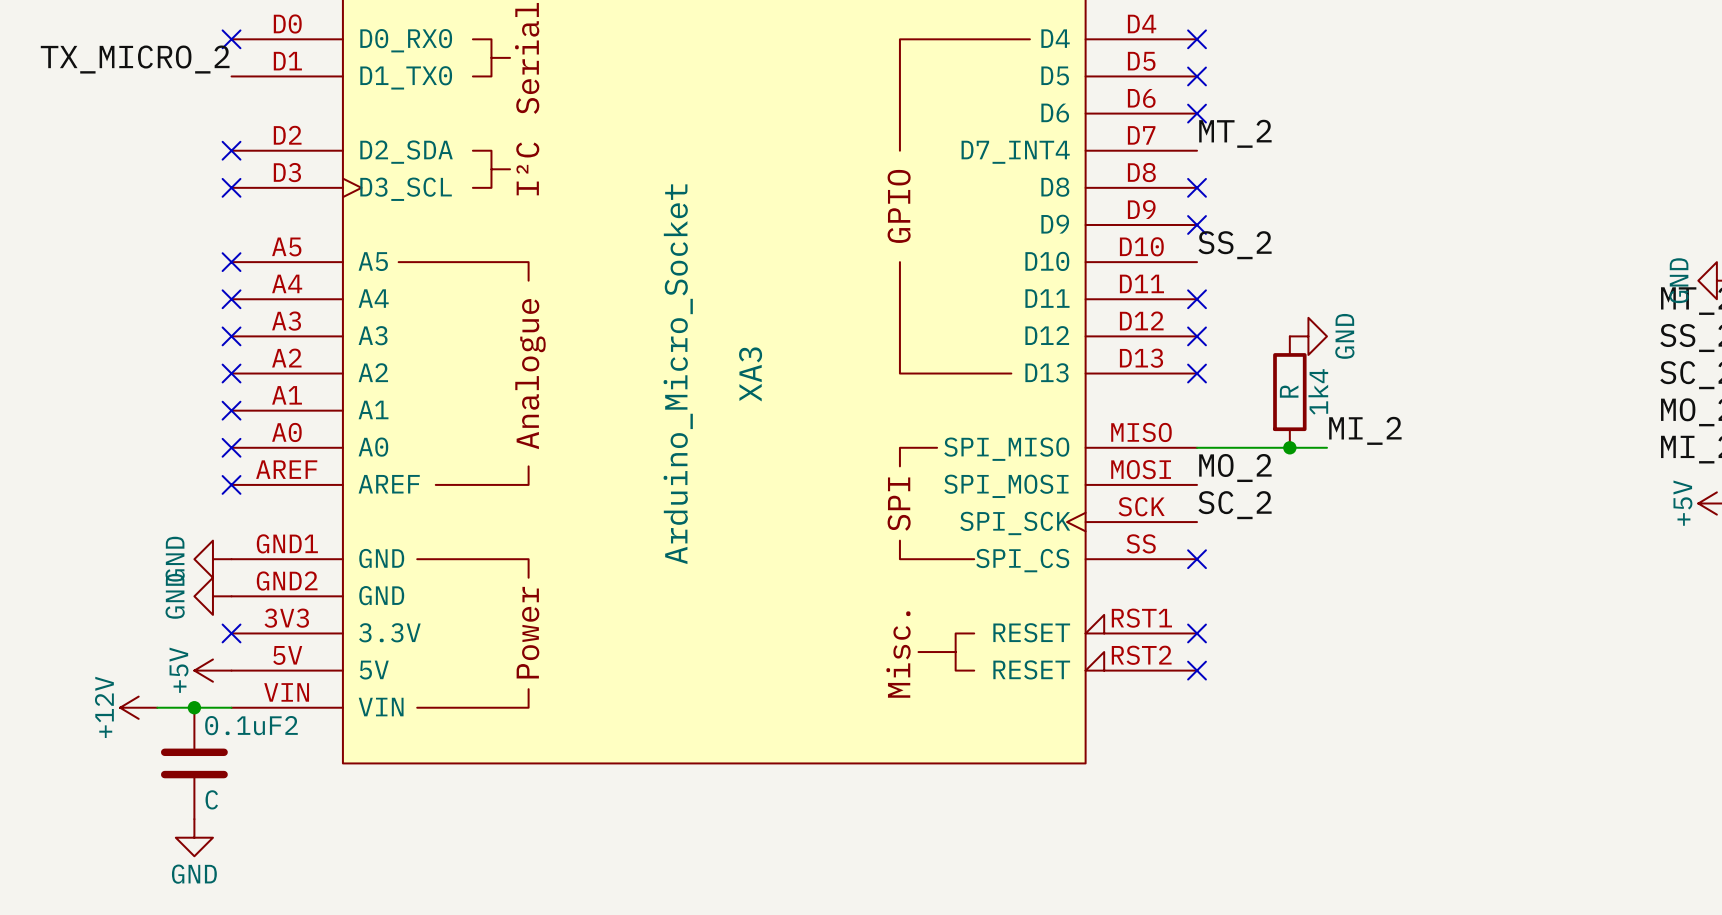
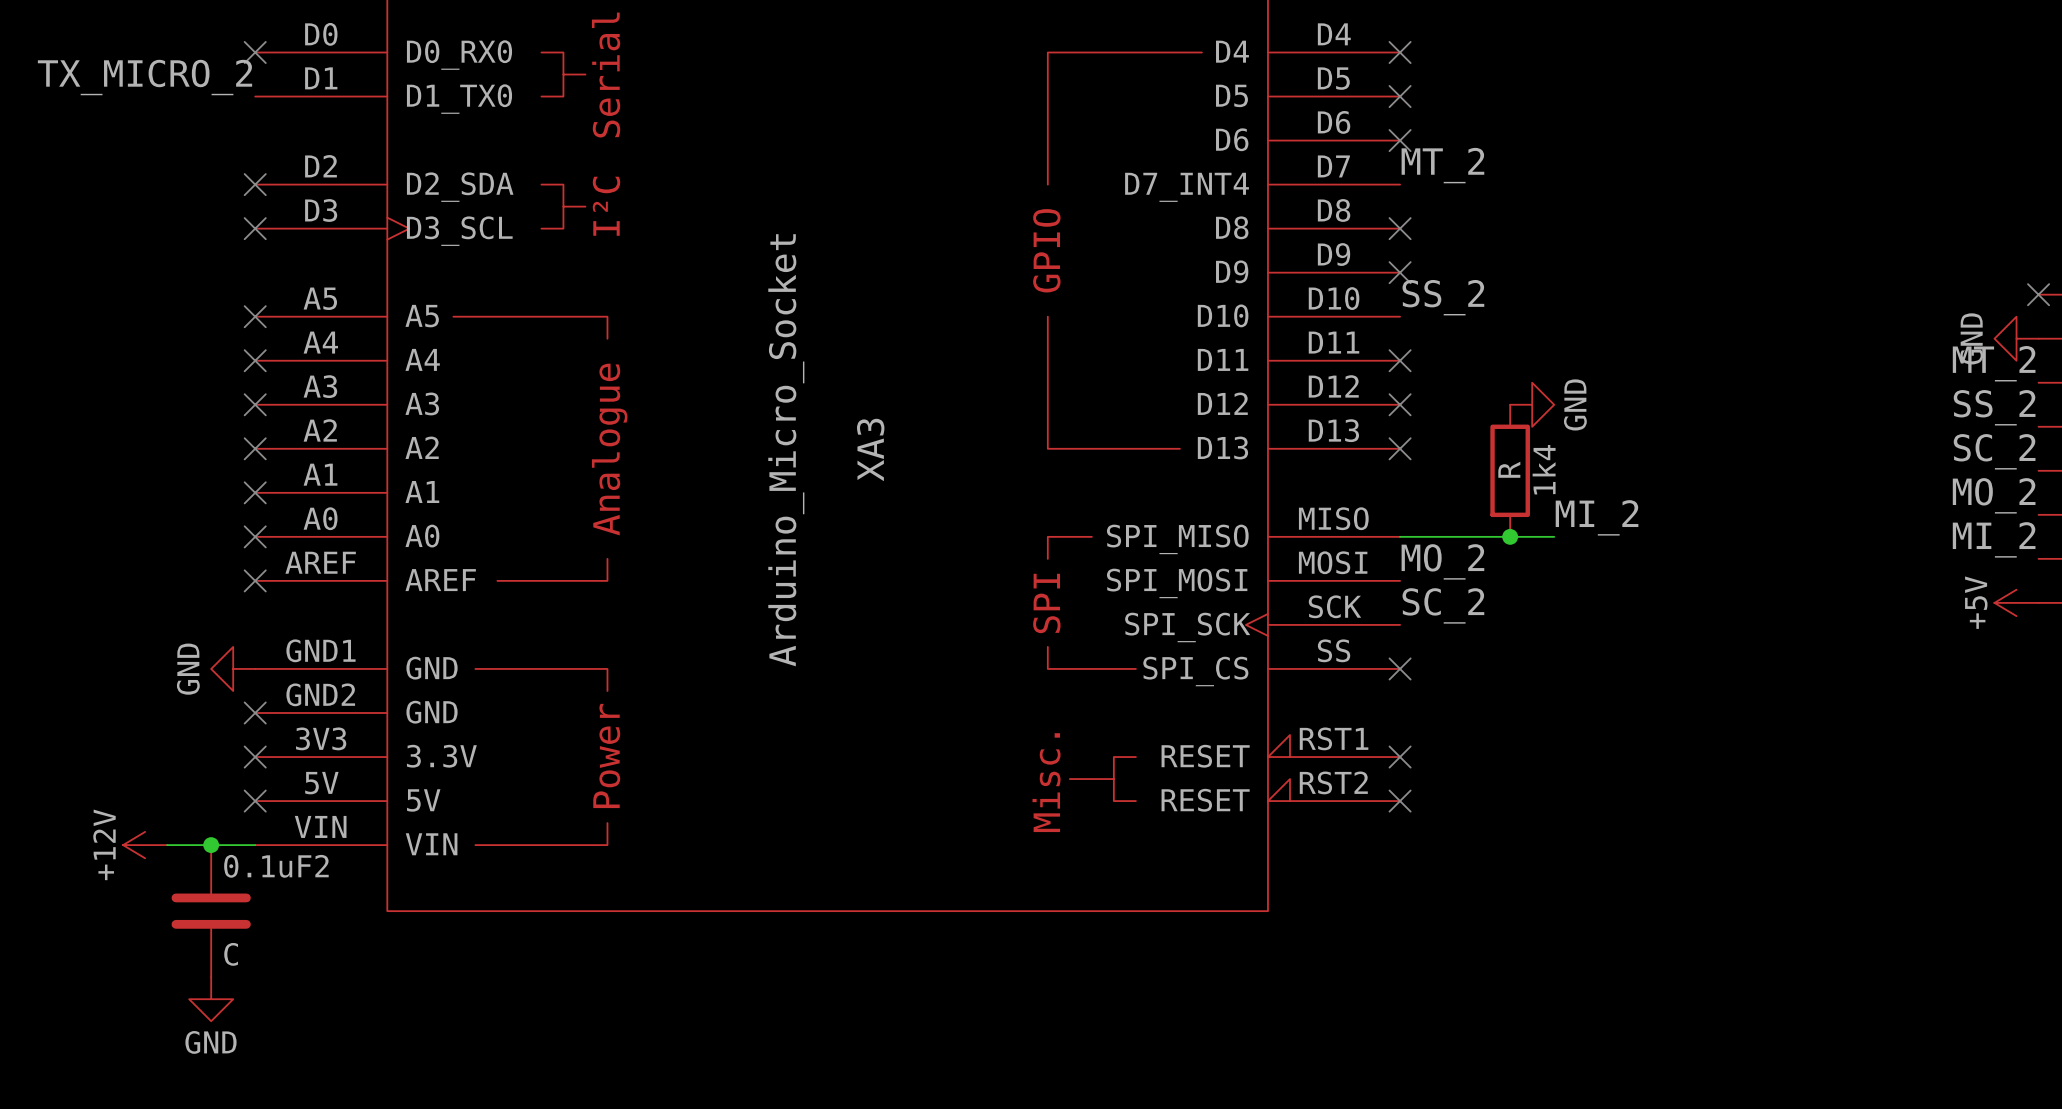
power symbol: GND (212, 596) -> none
no-connect mark: none -> (255, 712)
power symbol: +5V (212, 670) -> none
no-connect mark: none -> (255, 801)

